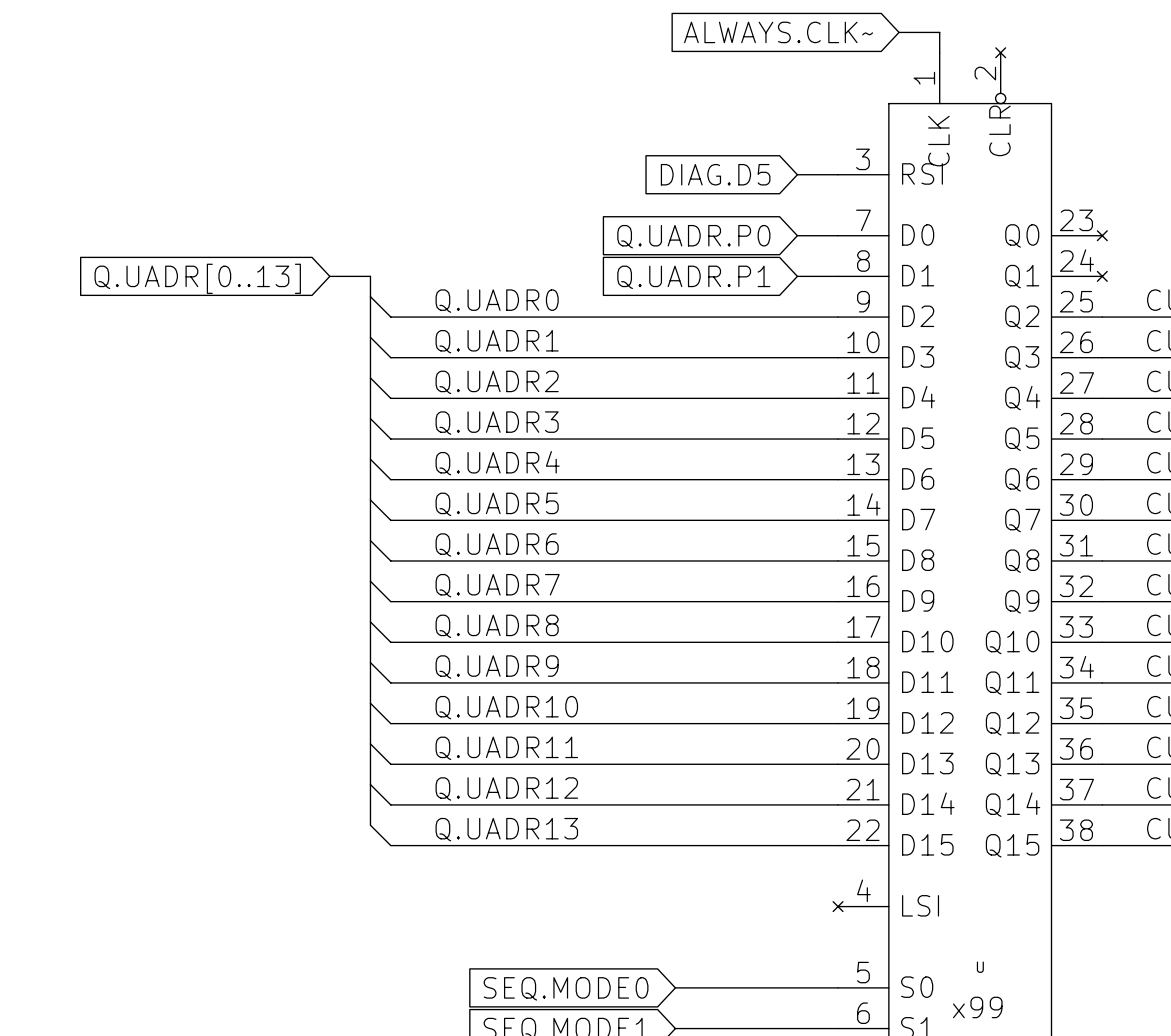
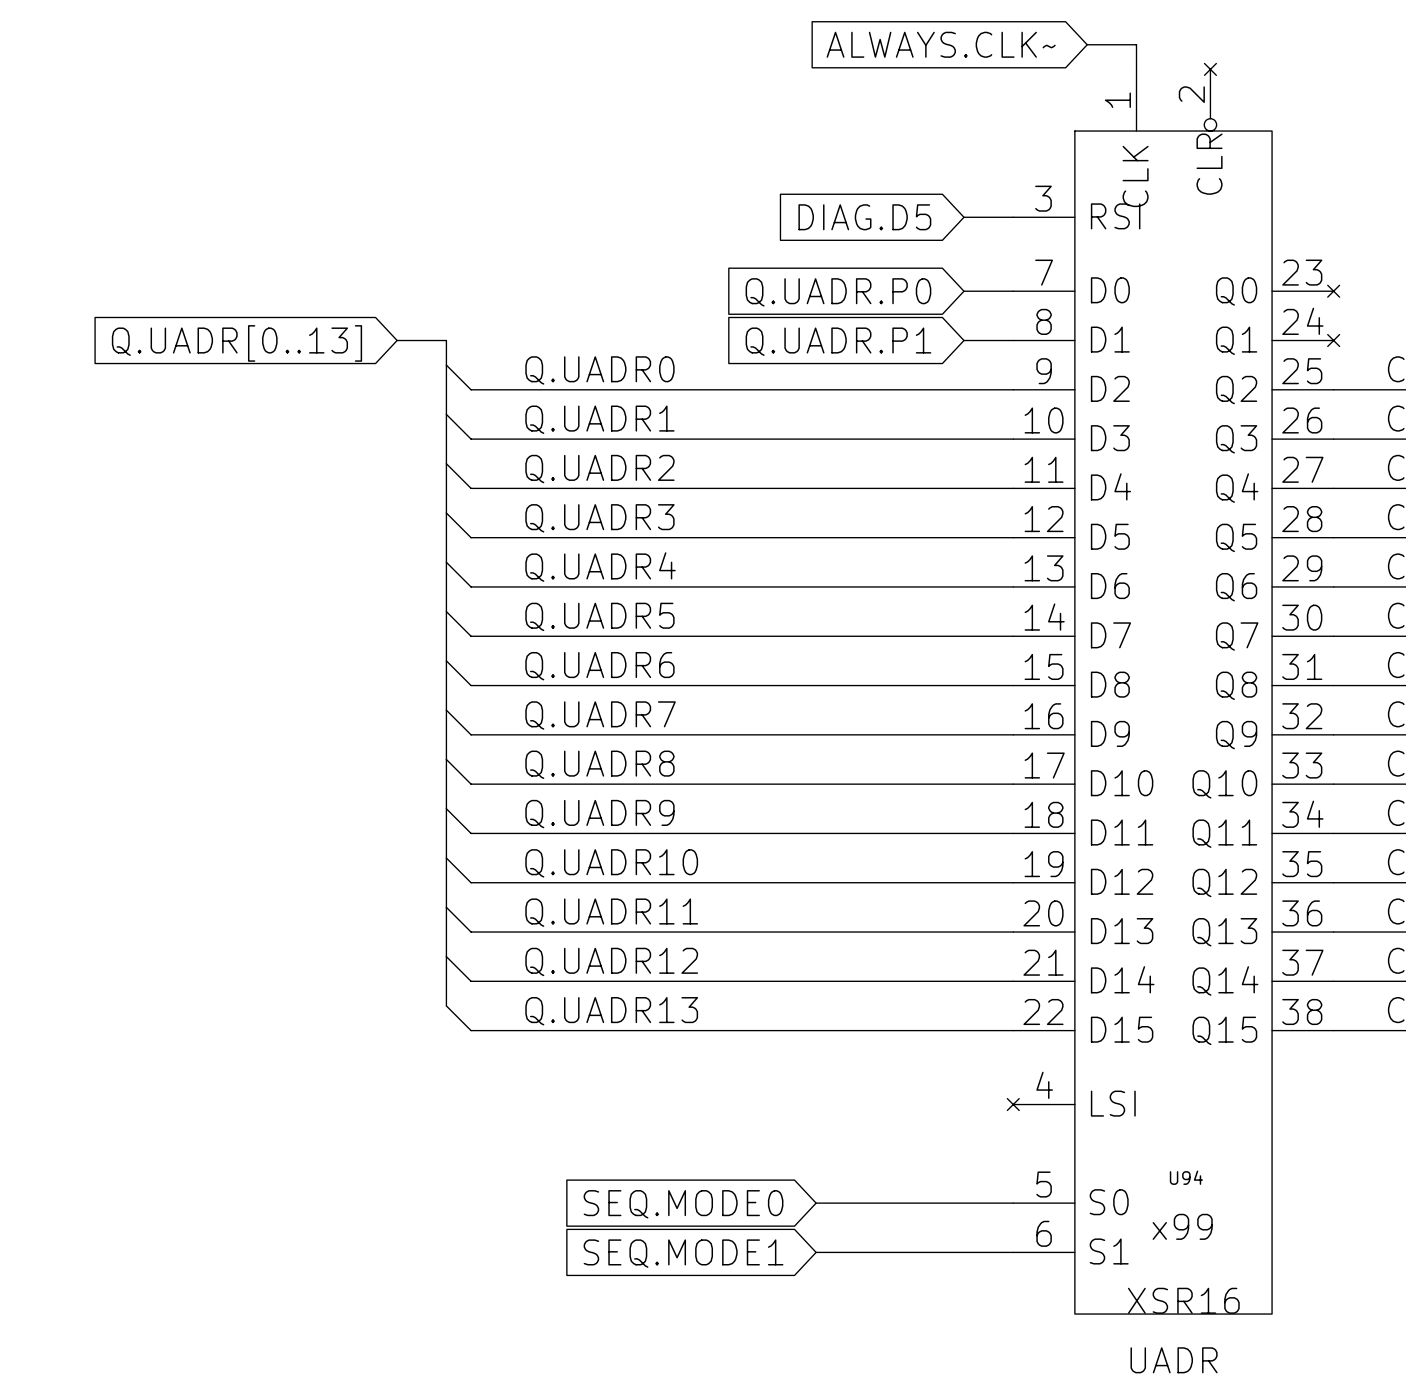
U name: U (980, 967) -> U94 (1186, 1177)

